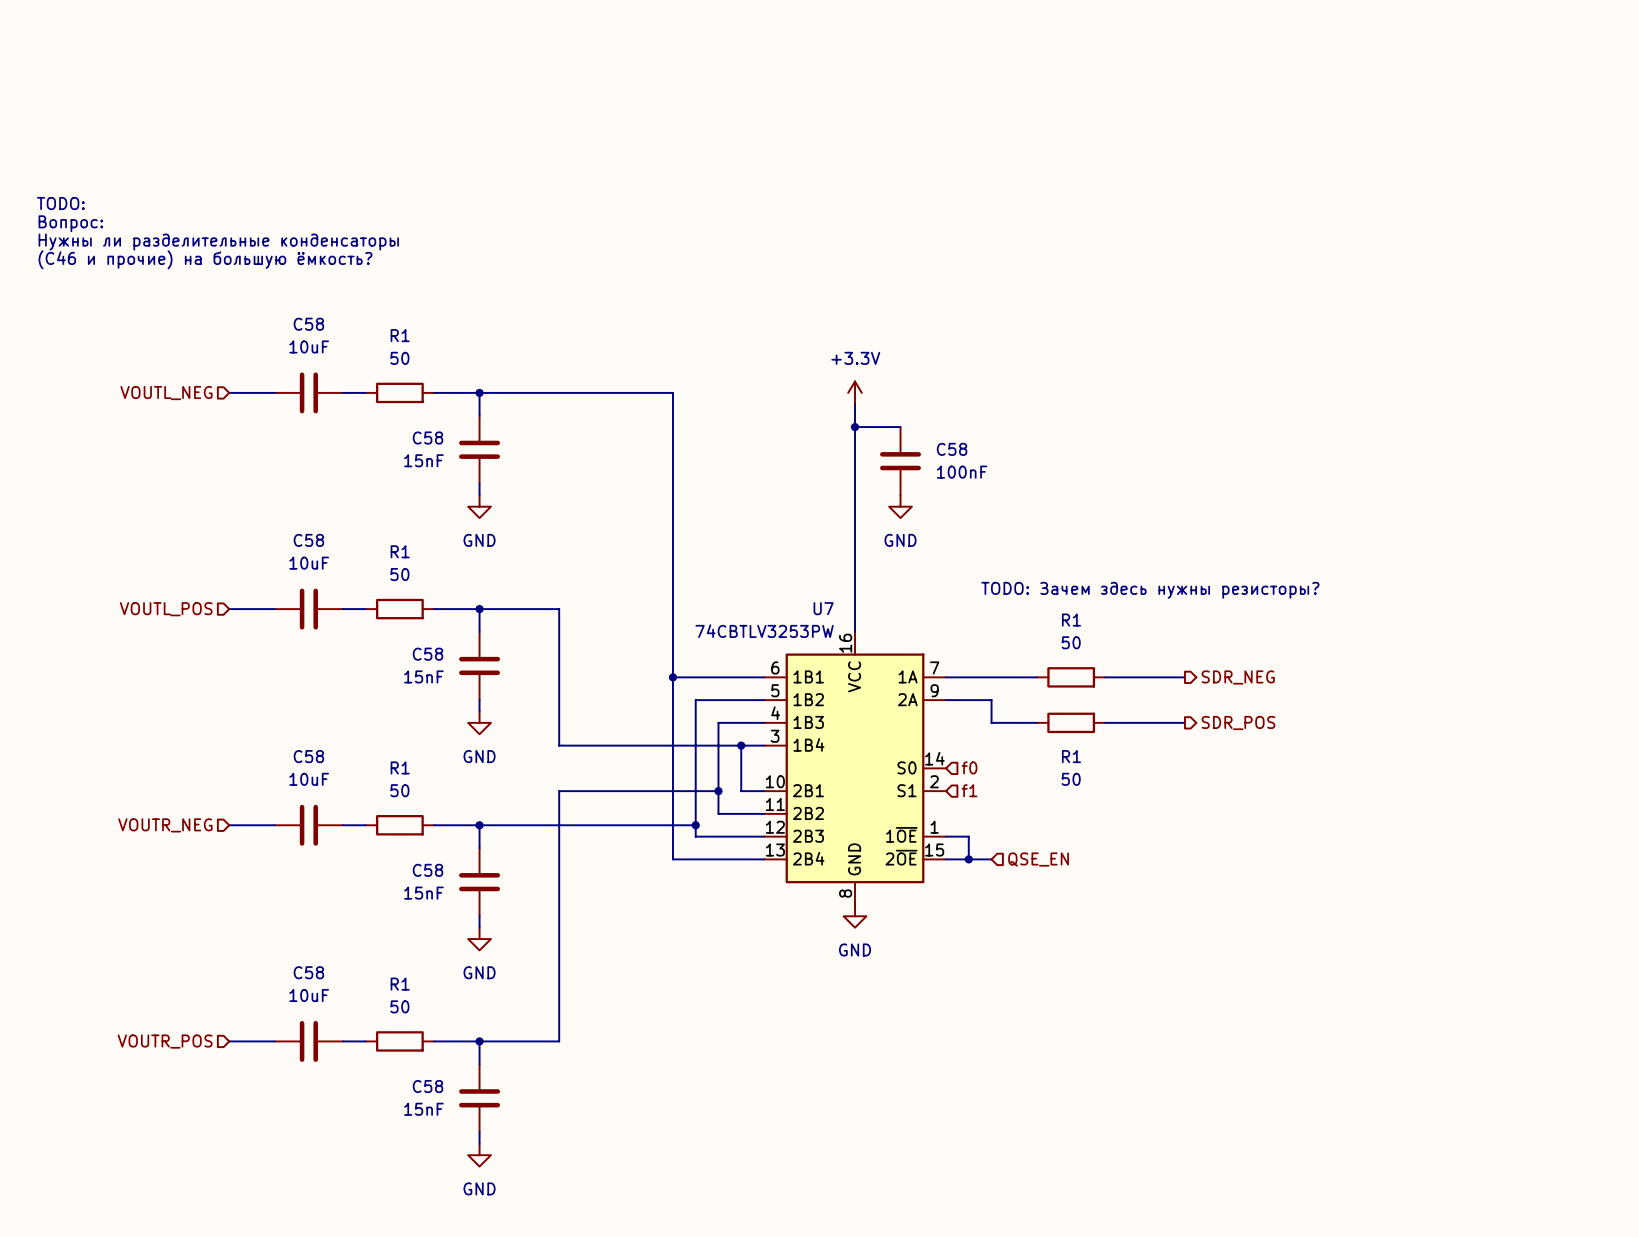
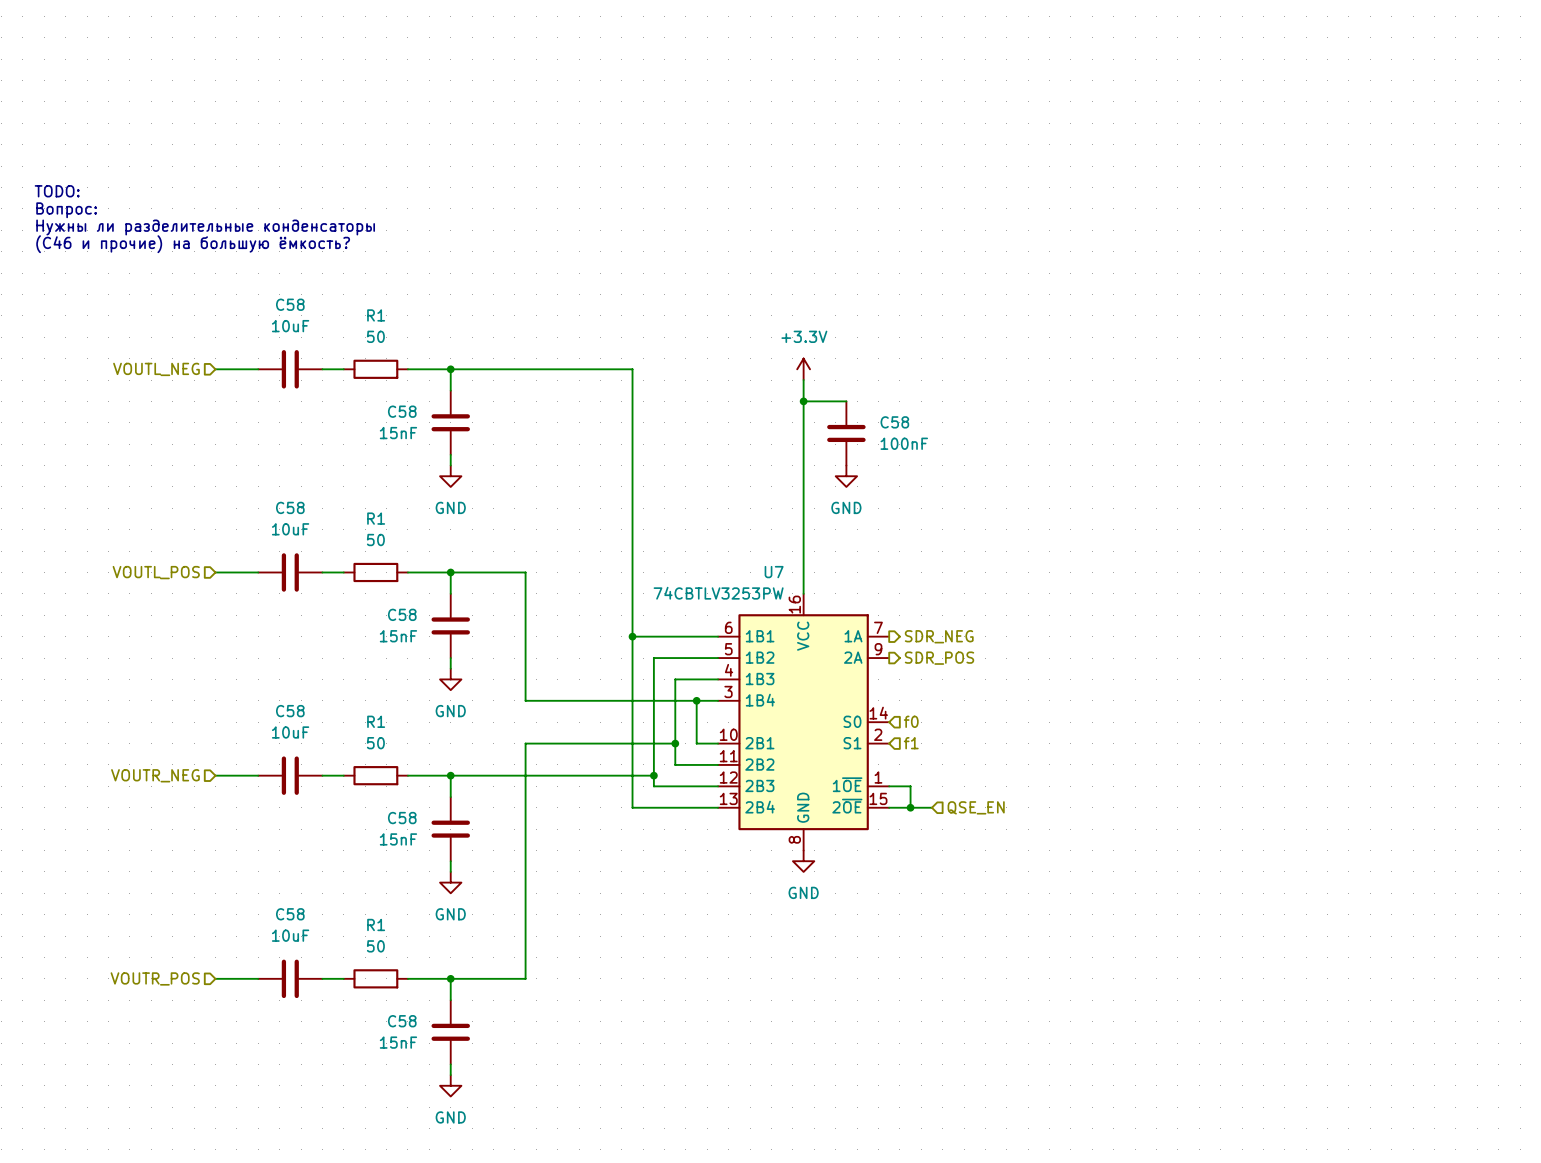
text: TODO: Зачем здесь нужны резисторы? (1150, 590) -> none
wire: (946, 677) (1037, 677) -> none
hierarchical label: none -> SDR_NEG (939, 636)
R1: 50 (1071, 677) -> none
wire: (1105, 677) (1184, 677) -> none
hierarchical label: SDR_NEG (1238, 677) -> none
wire: (946, 700) (991, 700) (991, 722) (1037, 722) -> none
hierarchical label: none -> SDR_POS (939, 658)
R1: 50 (1071, 722) -> none
wire: (1105, 722) (1184, 722) -> none
hierarchical label: SDR_POS (1238, 722) -> none

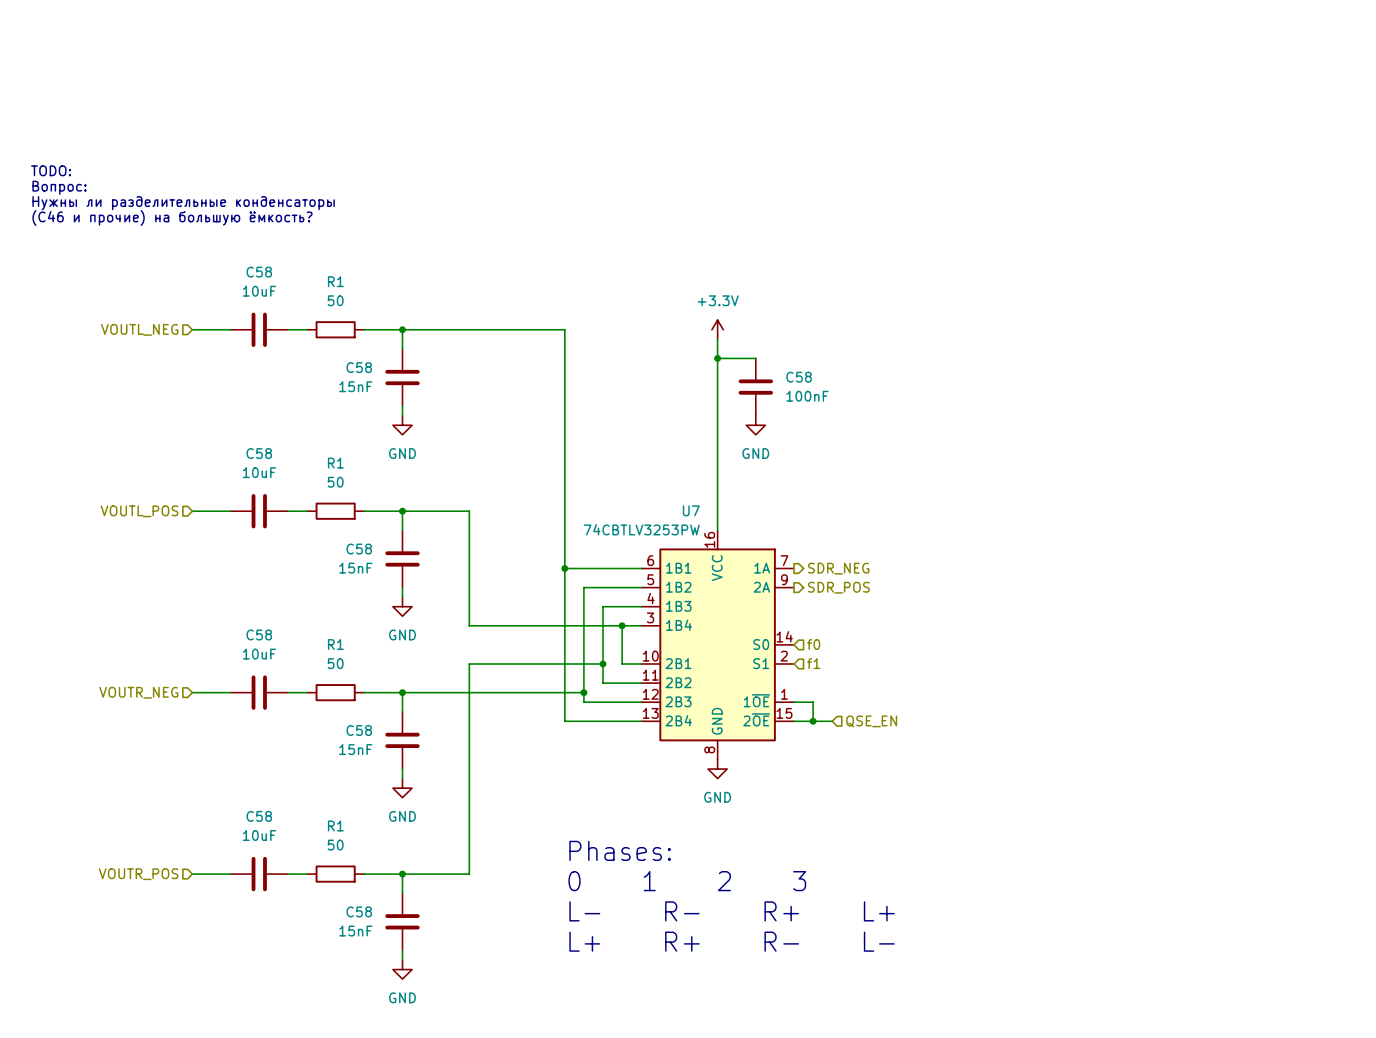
text: none -> Phases: (620, 850)
text: none -> 0 1 2 3 (687, 881)
text: none -> L- R- R+ L+ (732, 911)
text: none -> L+ R+ R- L- (732, 941)

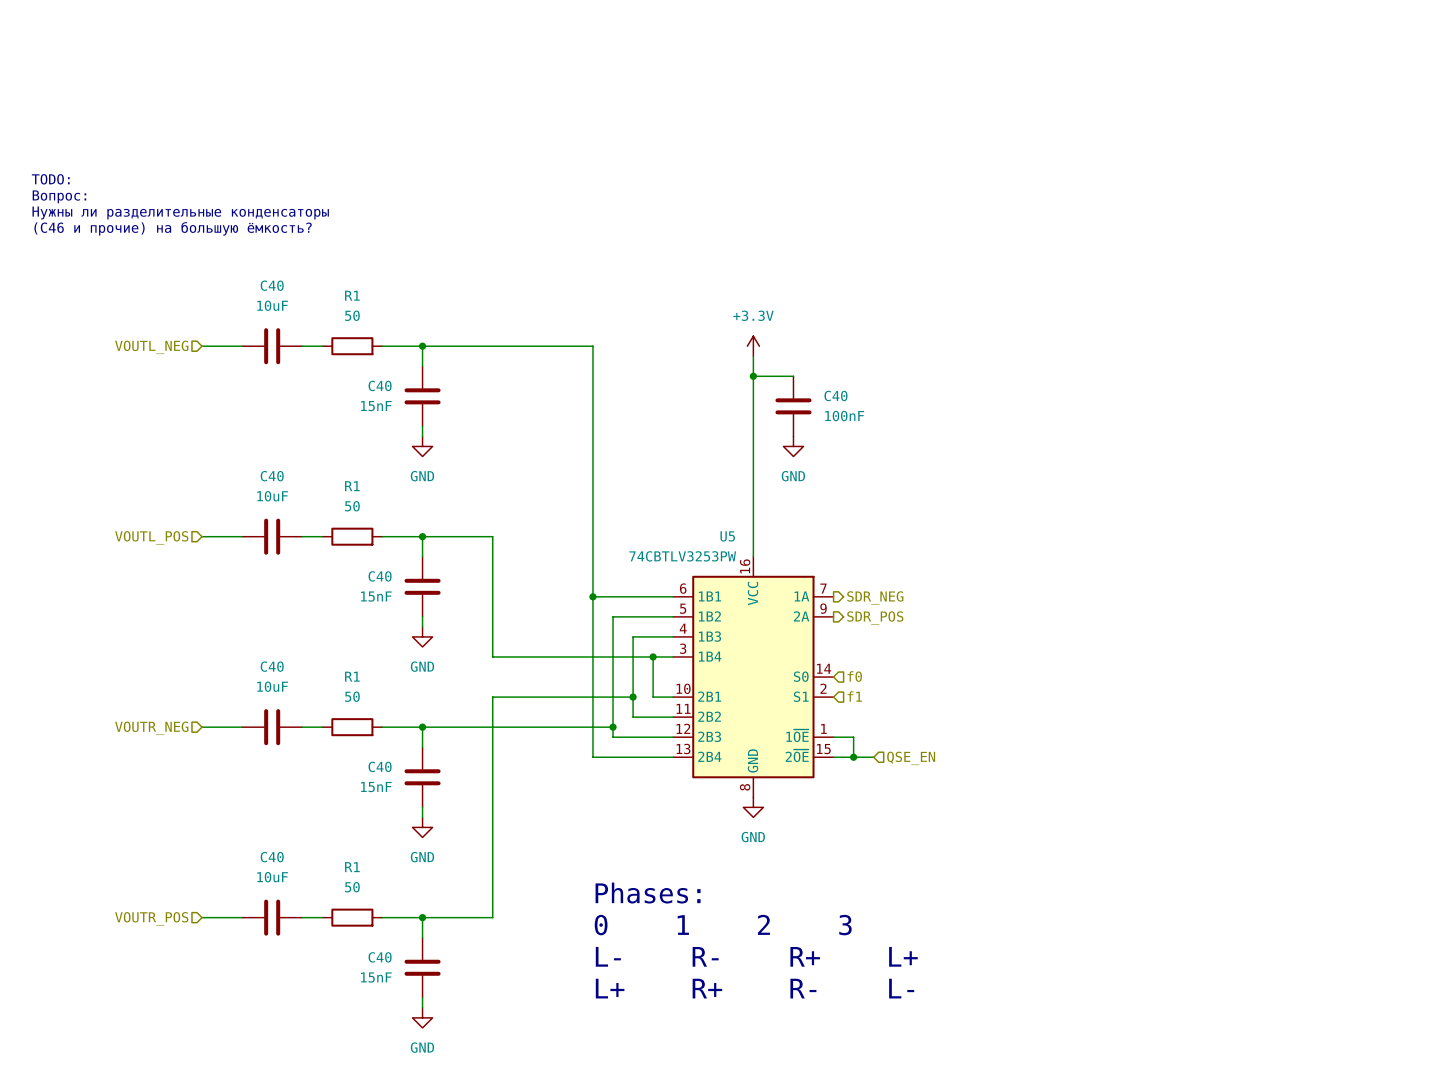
C58 name: C58 (259, 272) -> C40 (272, 285)
C58 name: C58 (359, 367) -> C40 (380, 385)
C58 name: C58 (799, 377) -> C40 (835, 395)
C58 name: C58 (259, 453) -> C40 (272, 476)
U7 name: U7 (691, 510) -> U5 (727, 536)
C58 name: C58 (359, 549) -> C40 (380, 576)
C58 name: C58 (259, 634) -> C40 (272, 666)
C58 name: C58 (359, 730) -> C40 (380, 766)
C58 name: C58 (259, 816) -> C40 (272, 857)
C58 name: C58 (359, 911) -> C40 (380, 957)

